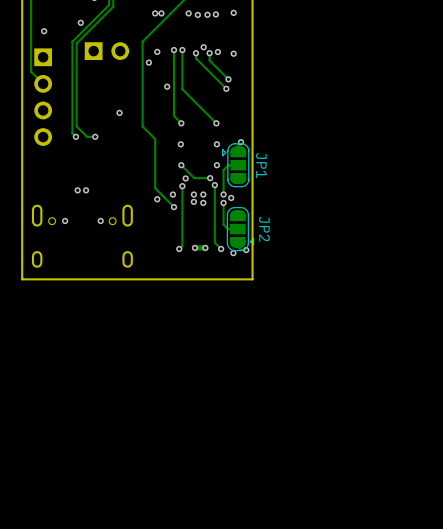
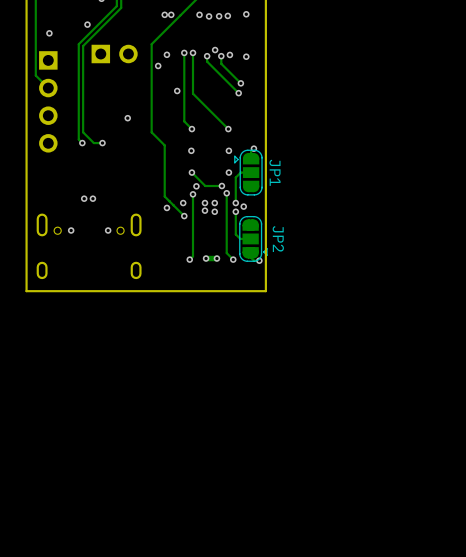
via: (233, 253) -> none

